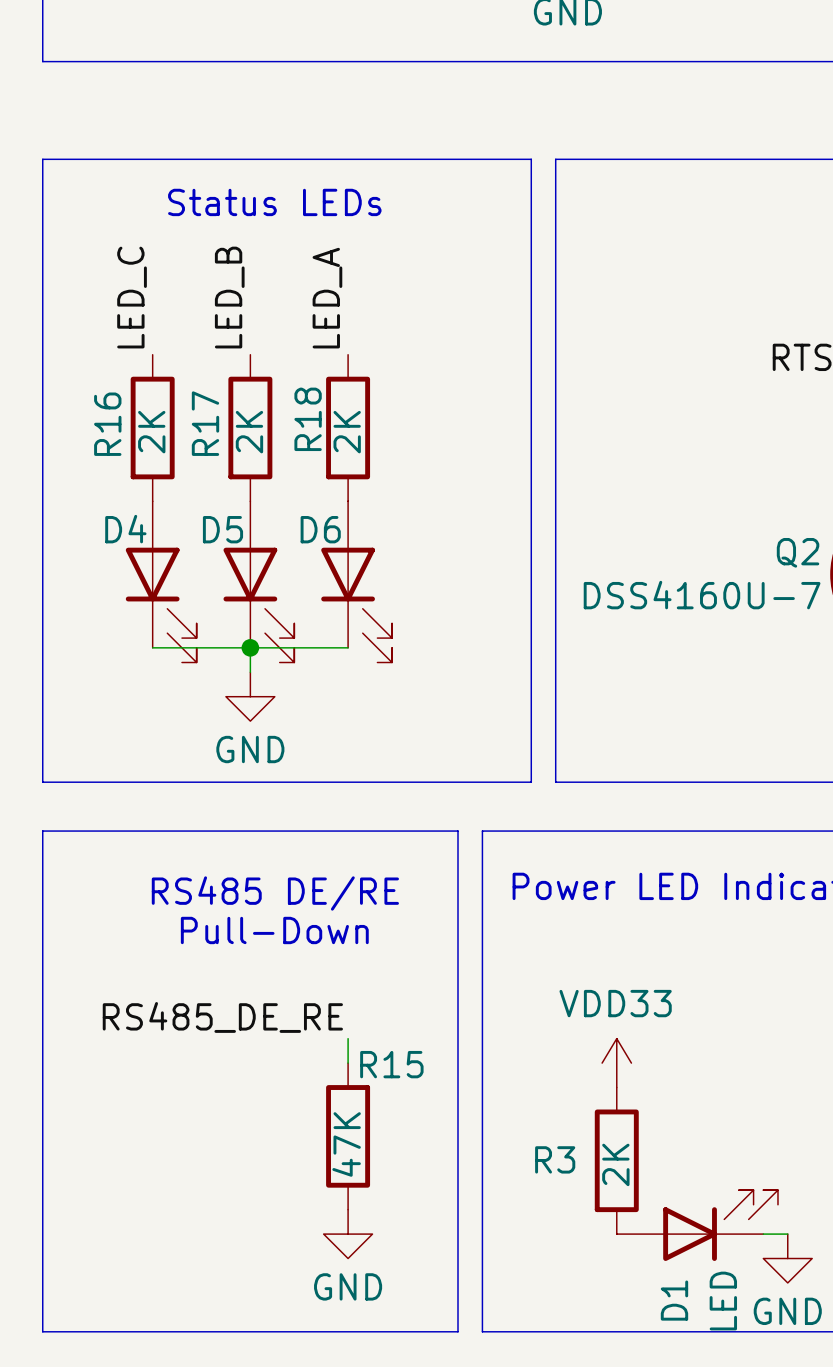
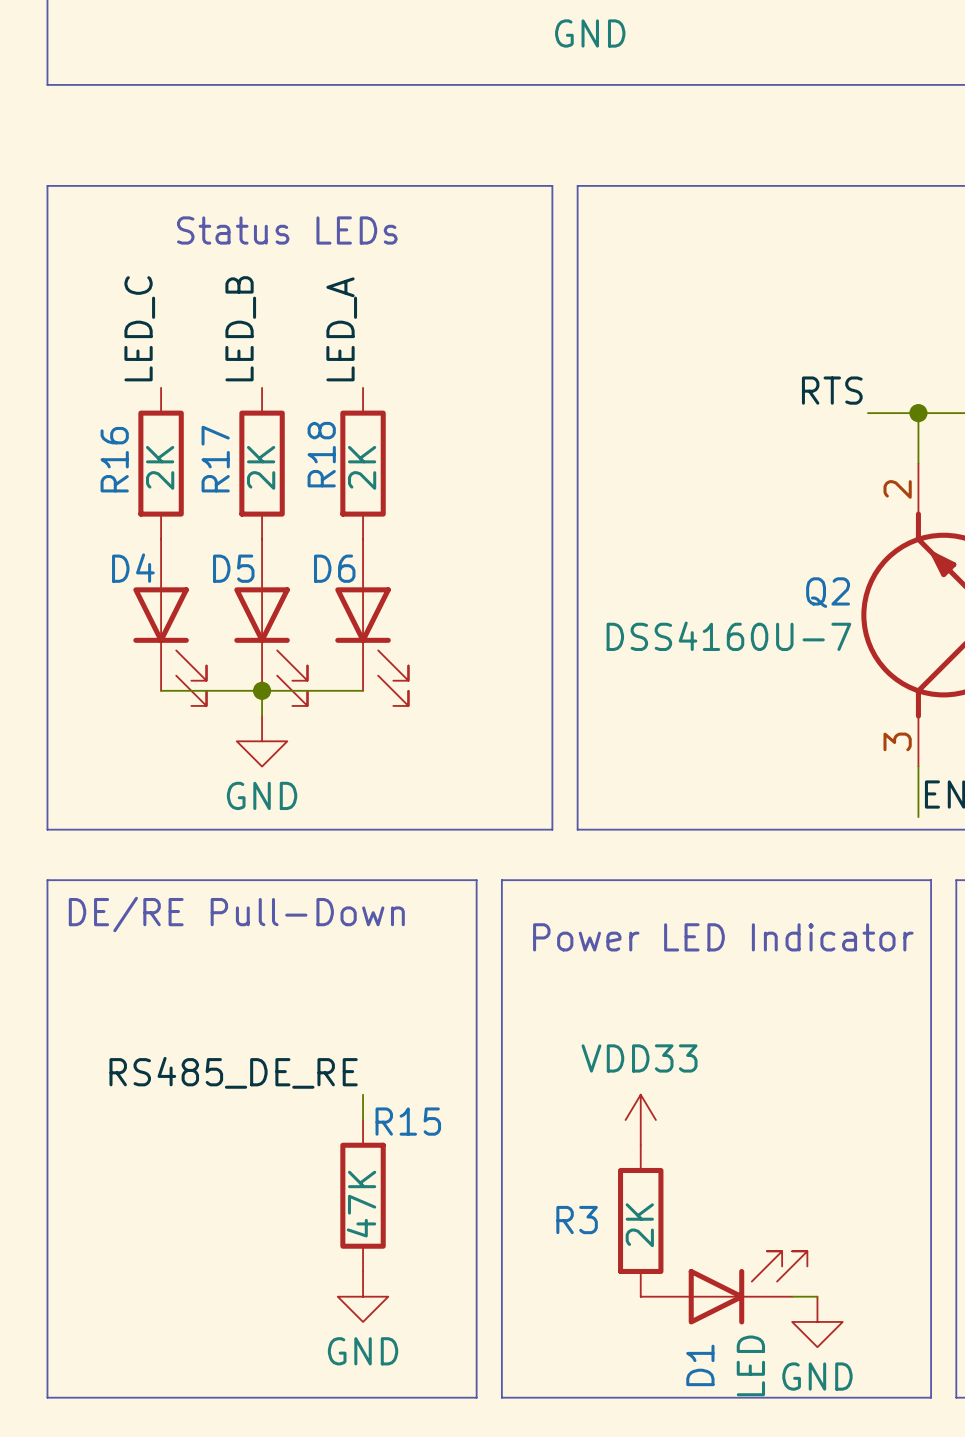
text: none -> DE/RE Pull-Down (236, 914)
text: RS485 DE/RE (275, 893) -> none
text: Pull-Down (274, 930) -> none

